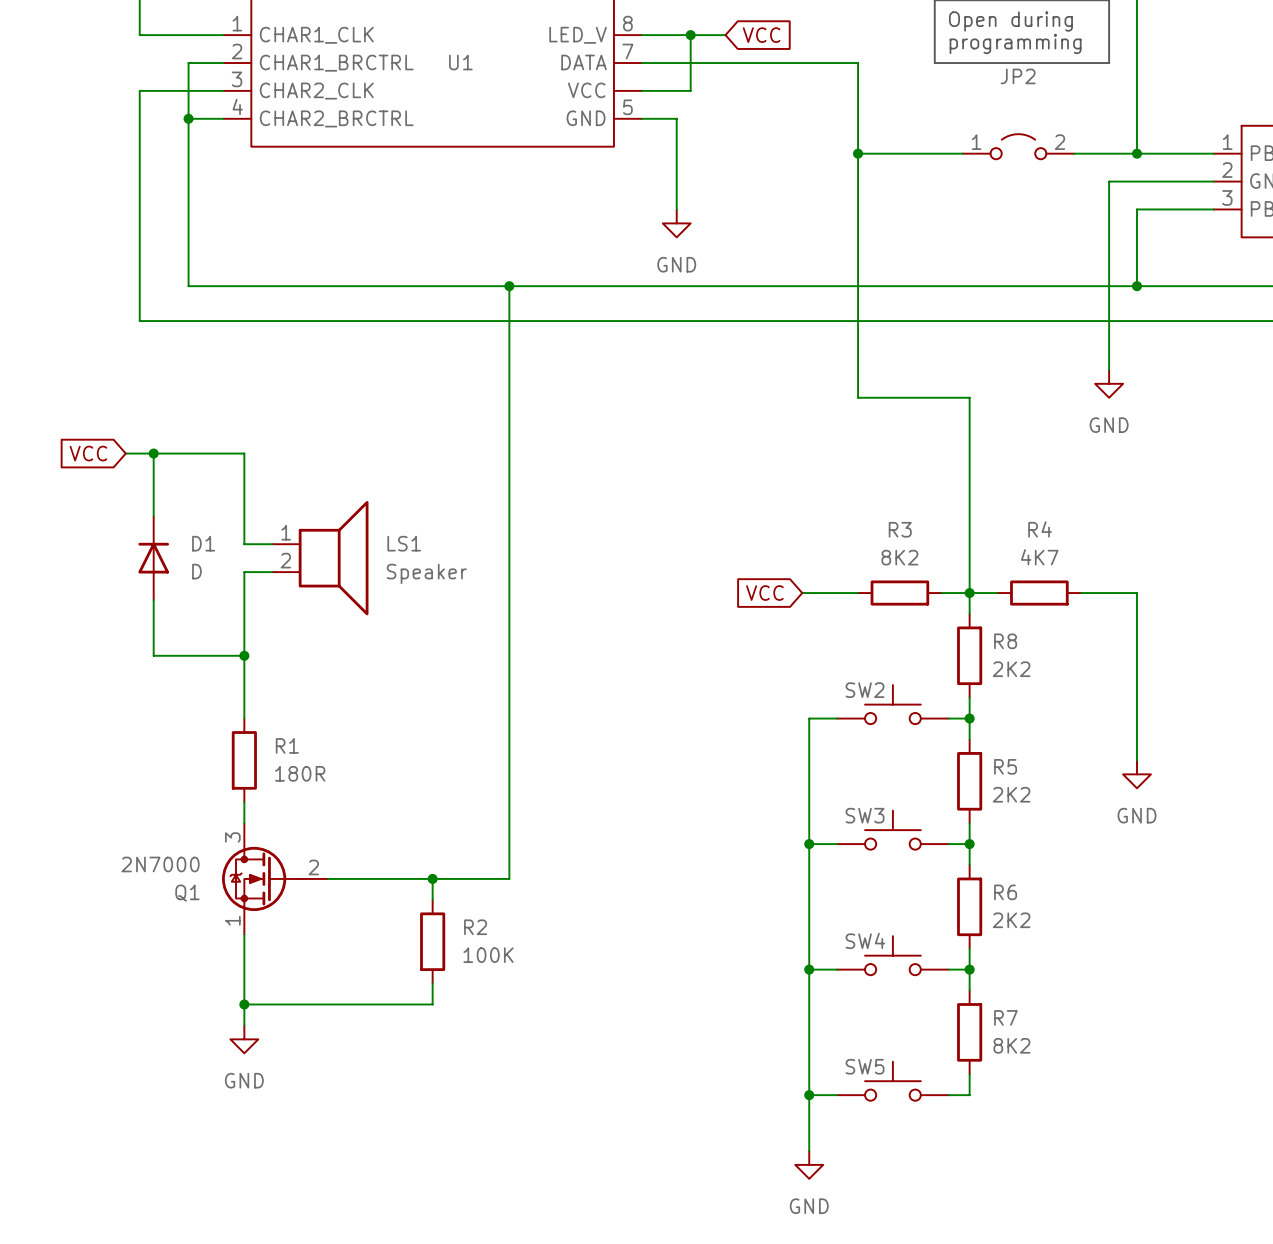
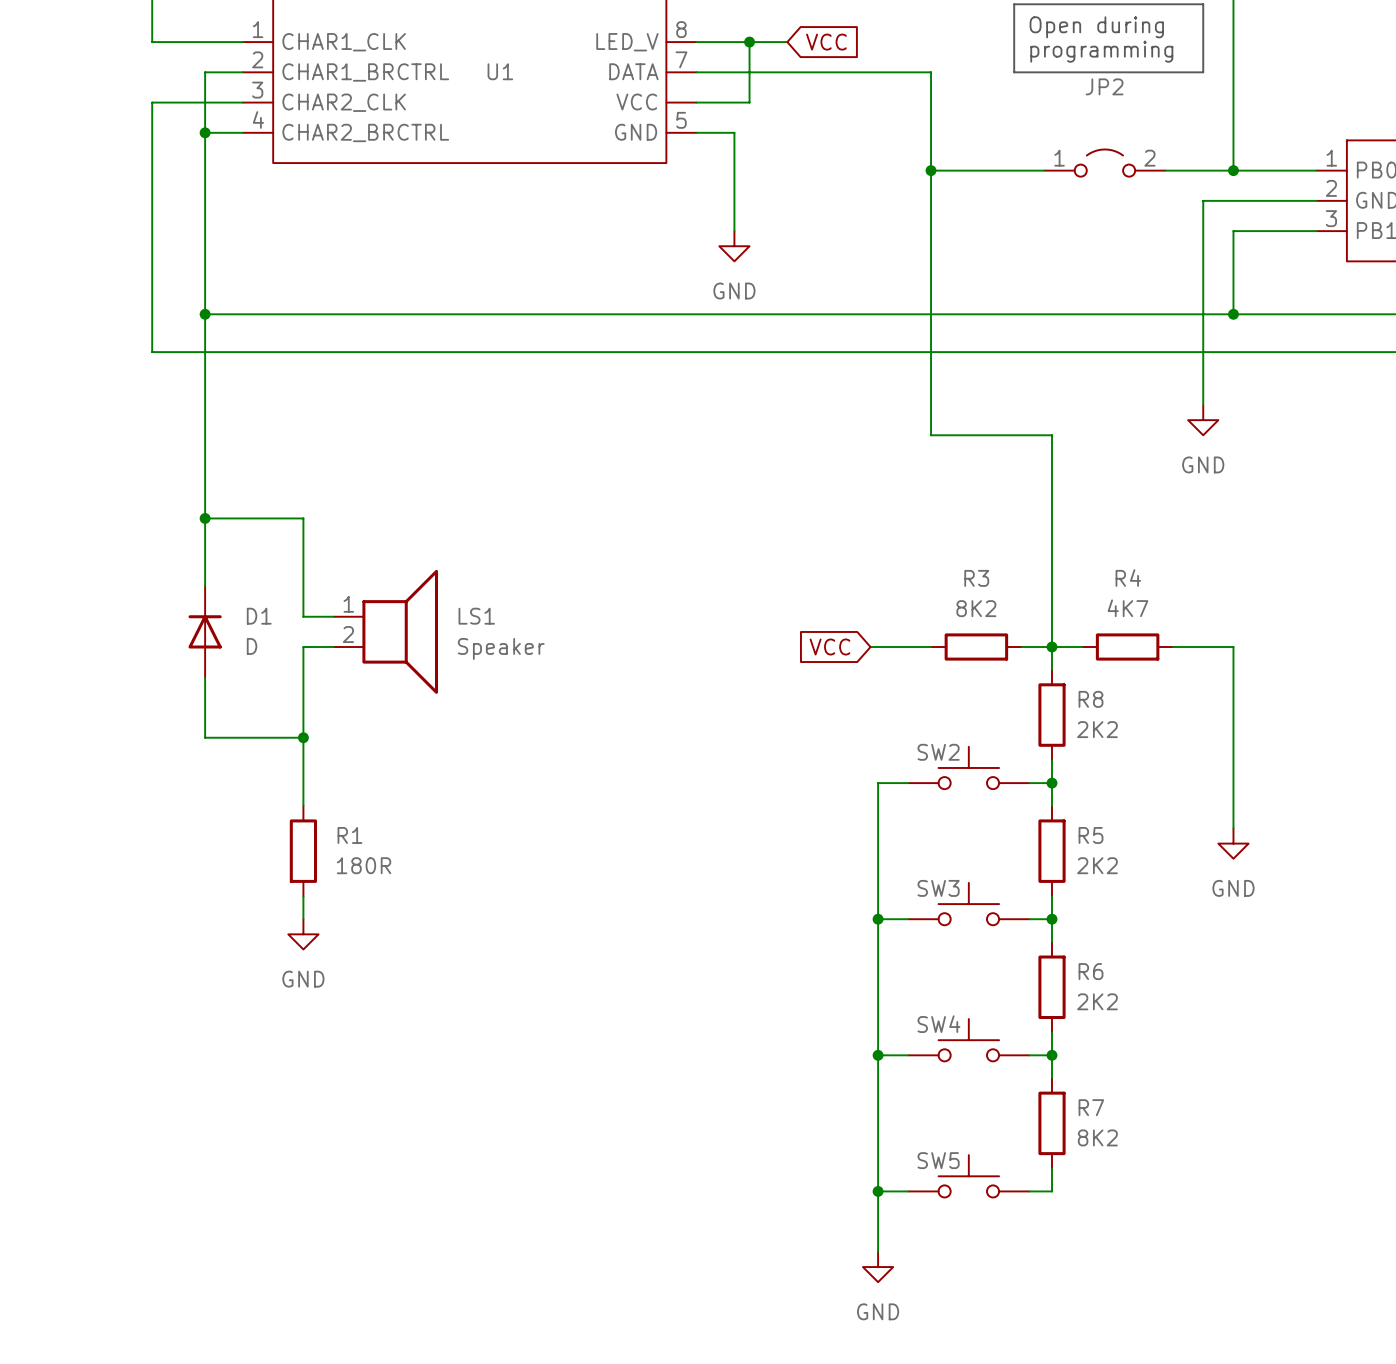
wire: none -> (205, 314) (205, 586)
junction: none -> (205, 314)
wire: (509, 286) (509, 878) (328, 878) -> none
junction: (509, 286) -> none
global label: VCC (88, 453) -> none
wire: (125, 453) (244, 453) (244, 544) (272, 544) -> none
wire: (153, 453) (153, 516) -> none
junction position: (153, 453) -> (205, 518)
wire: none -> (205, 518) (303, 518) (303, 616) (333, 616)
D1 position: (153, 558) -> (205, 631)
LS1 position: (320, 558) -> (385, 631)
wire: (272, 572) (244, 572) (244, 718) -> (333, 647) (303, 647) (303, 805)
wire: (153, 600) (153, 655) (244, 655) -> (205, 677) (205, 737) (303, 737)
junction position: (244, 655) -> (303, 737)
R1 position: (244, 760) -> (303, 851)
wire: (244, 802) (244, 823) -> (303, 896) (303, 919)
Q1: 2N7000 (275, 878) -> none
wire: (432, 878) (432, 899) -> none
junction: (432, 878) -> none
wire: (244, 934) (244, 1025) -> none
R2: 100K (432, 941) -> none
wire: (432, 983) (432, 1004) (244, 1004) -> none
junction: (244, 1004) -> none
power symbol position: GND (244, 1039) -> GND (303, 934)

